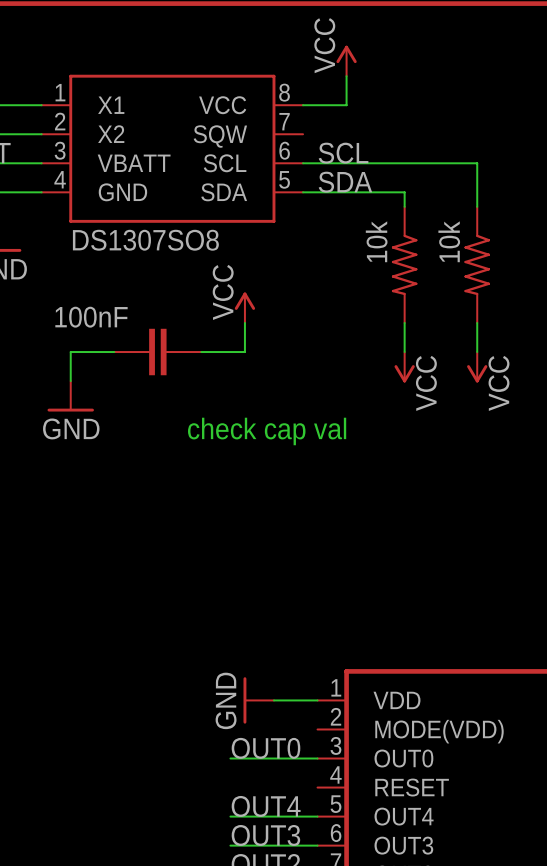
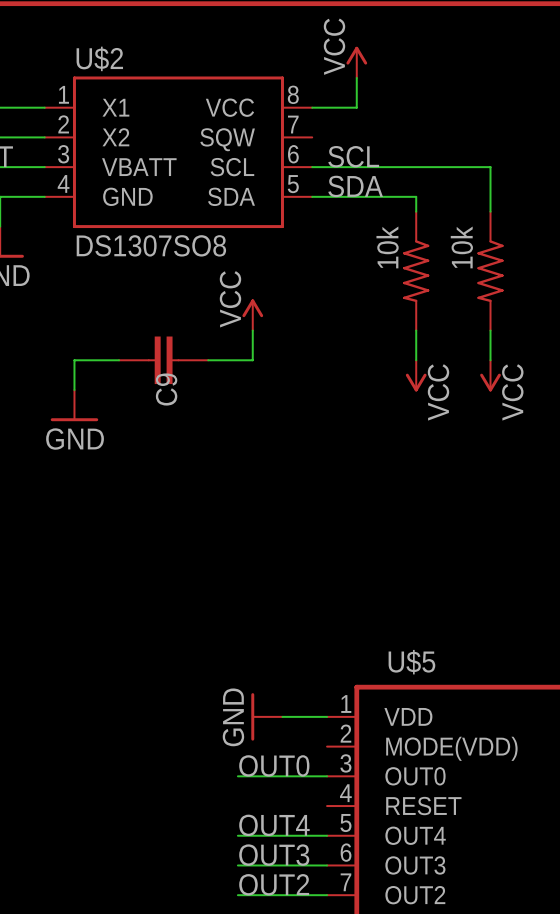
U$2 name: none -> U$2 (99, 58)
C9 value: 100nF (91, 317) -> none
C9 name: none -> C9 (166, 389)
text: check cap val (267, 431) -> none
U$5 name: none -> U$5 (411, 662)

